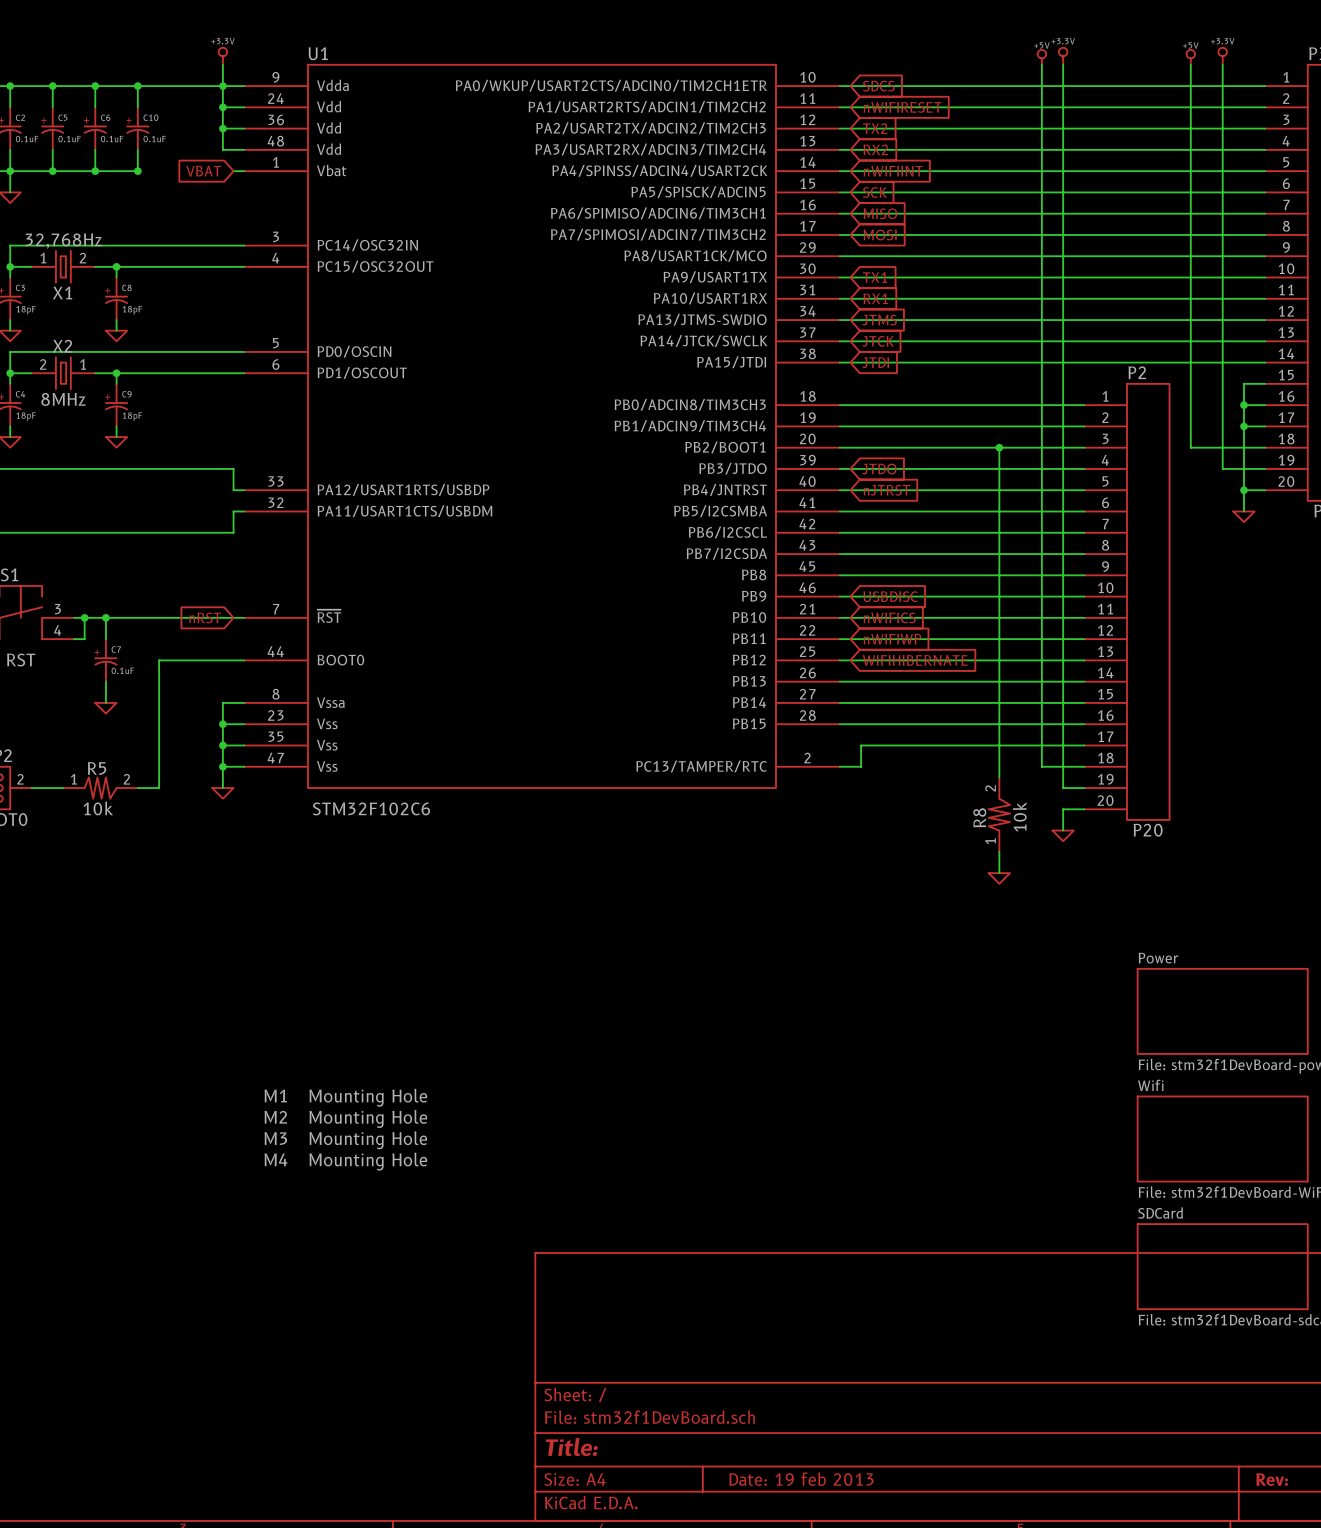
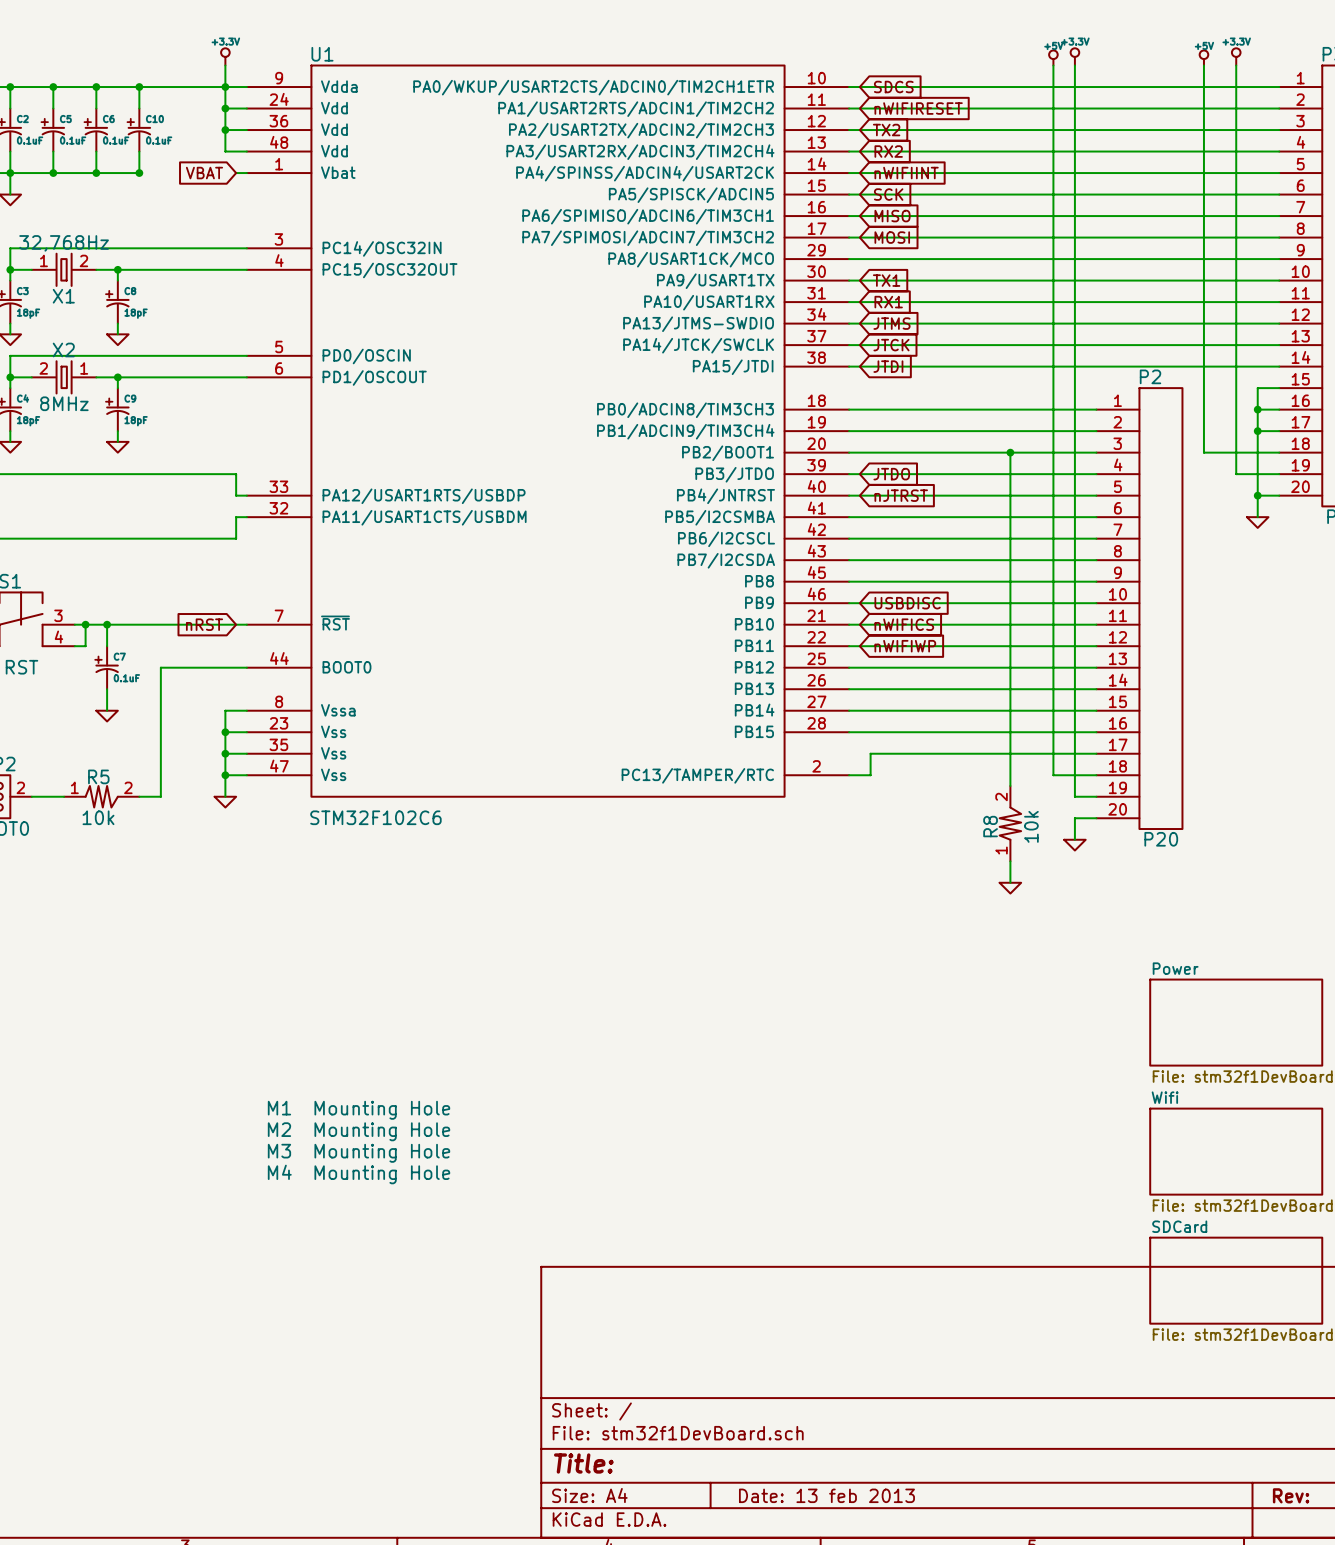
global label: WIFIHIBERNATE (915, 660) -> none
title block: Date: 19 feb 2013 (801, 1479) -> Date: 13 feb 2013 (826, 1495)

